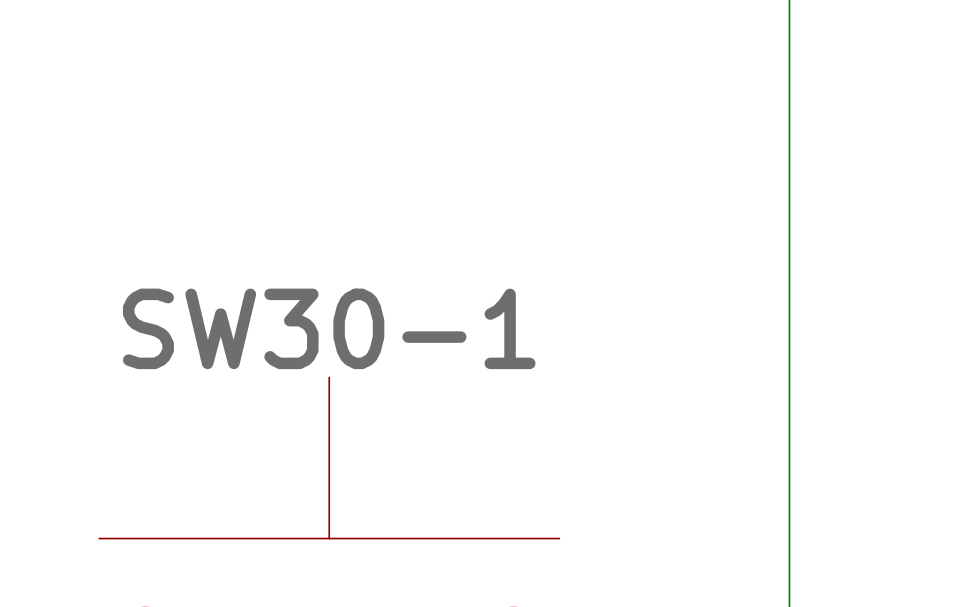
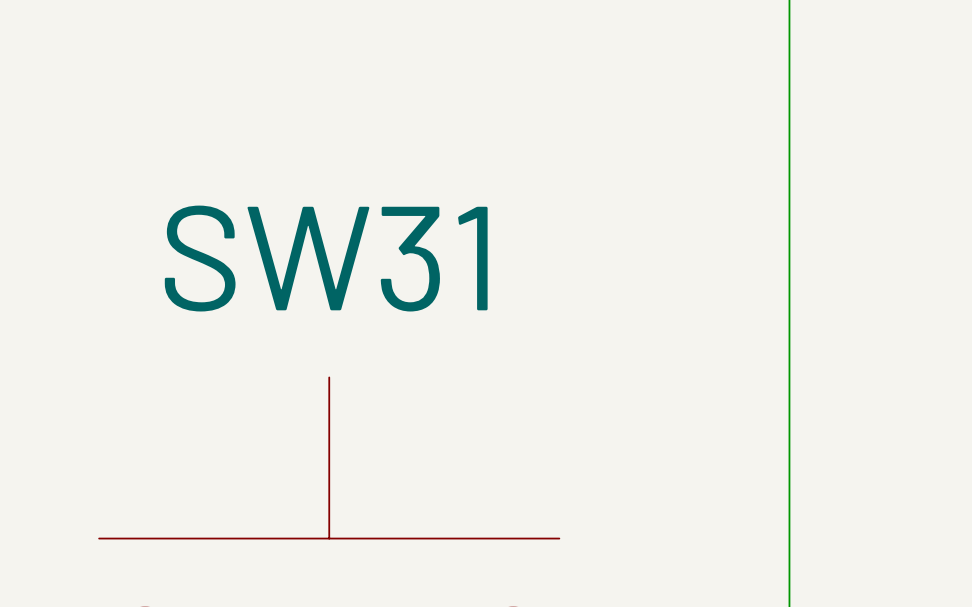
SW30-1 name: SW30-1 (329, 328) -> SW31 (326, 258)

